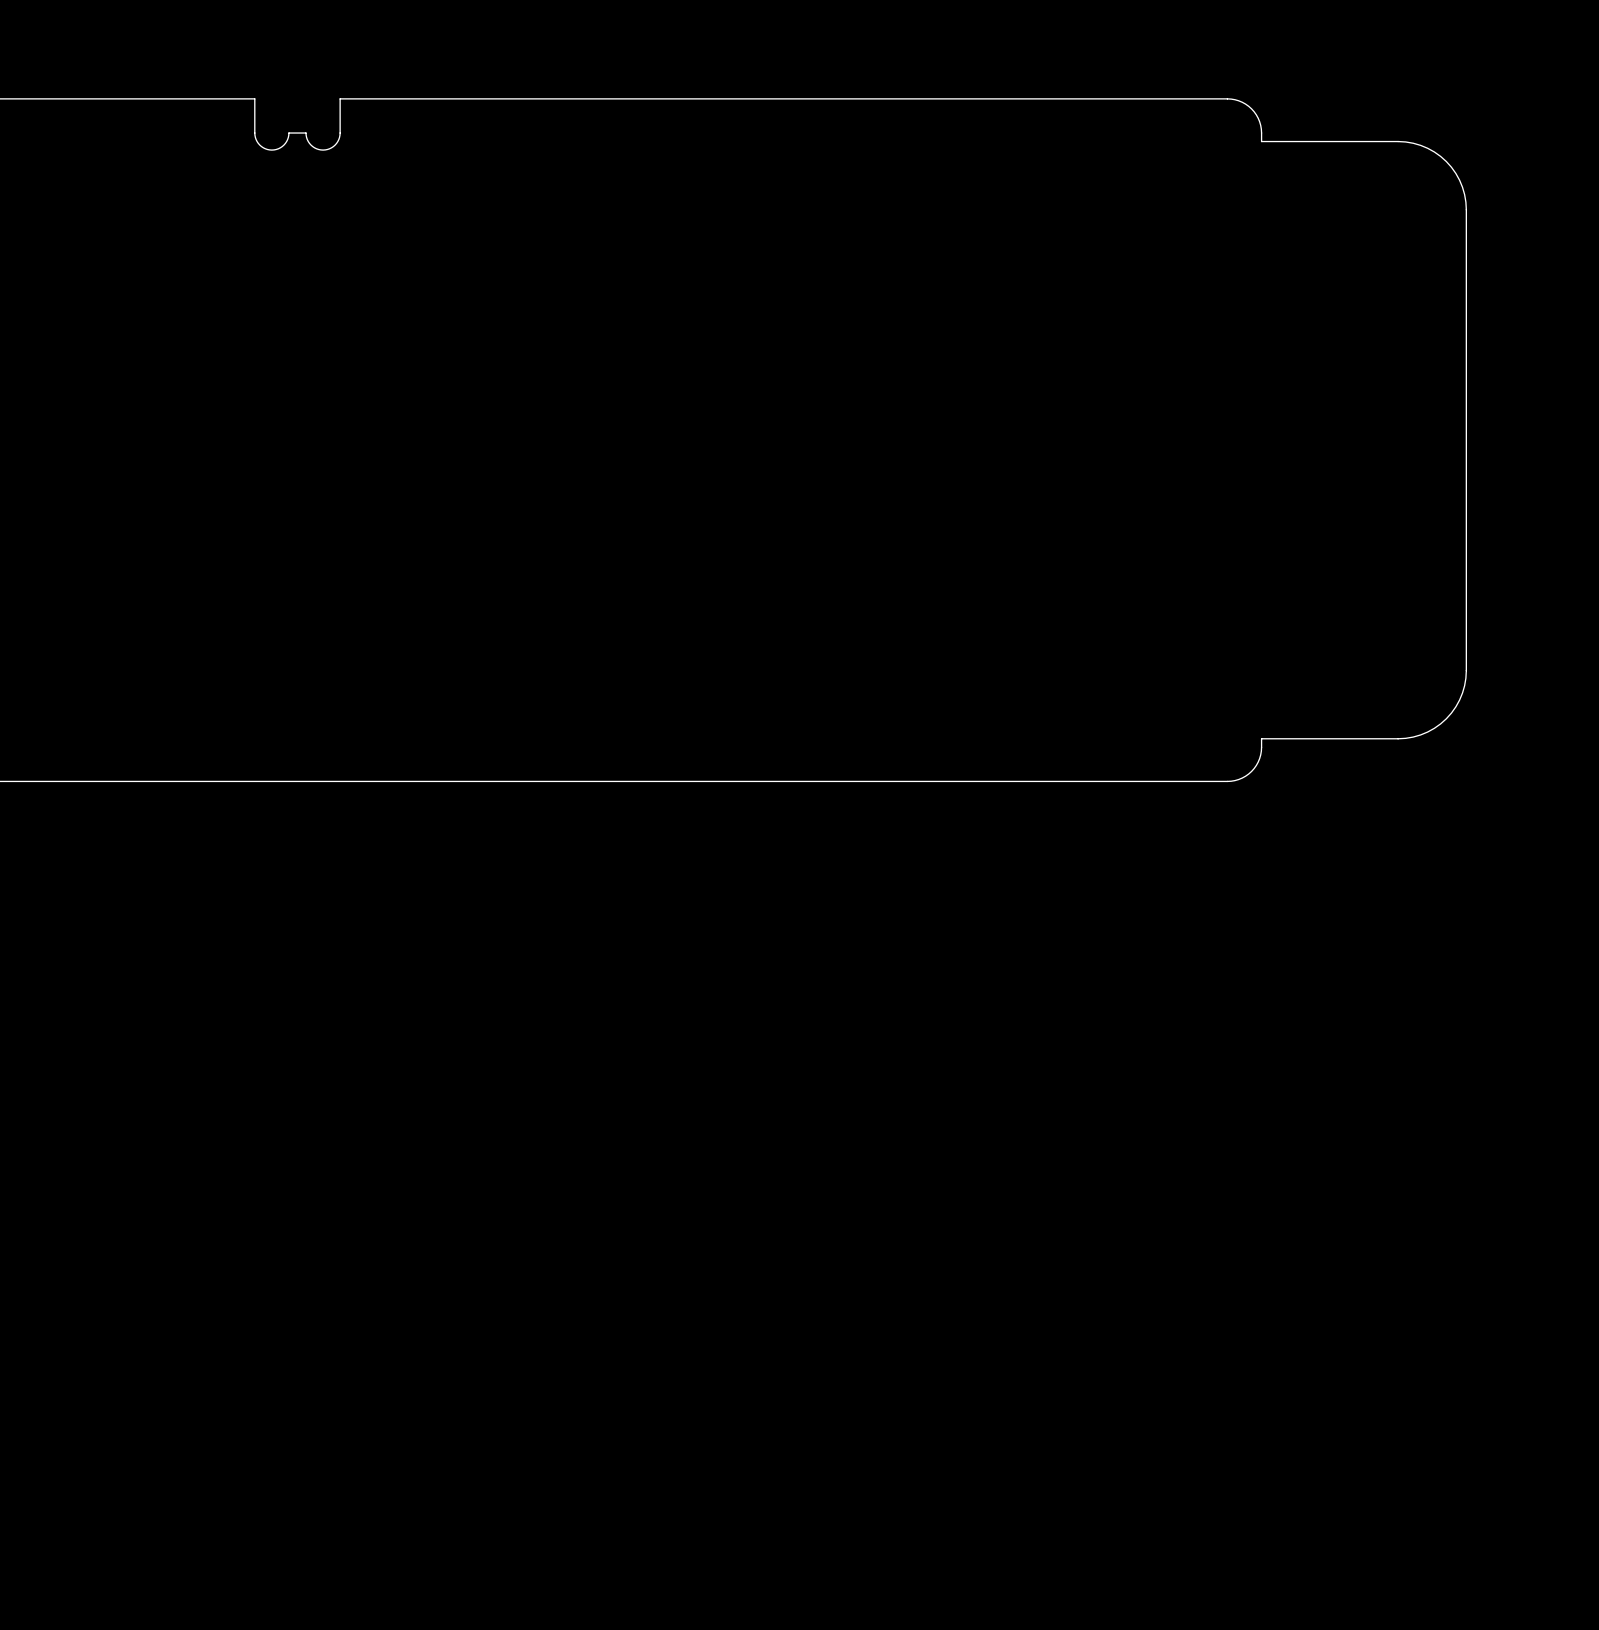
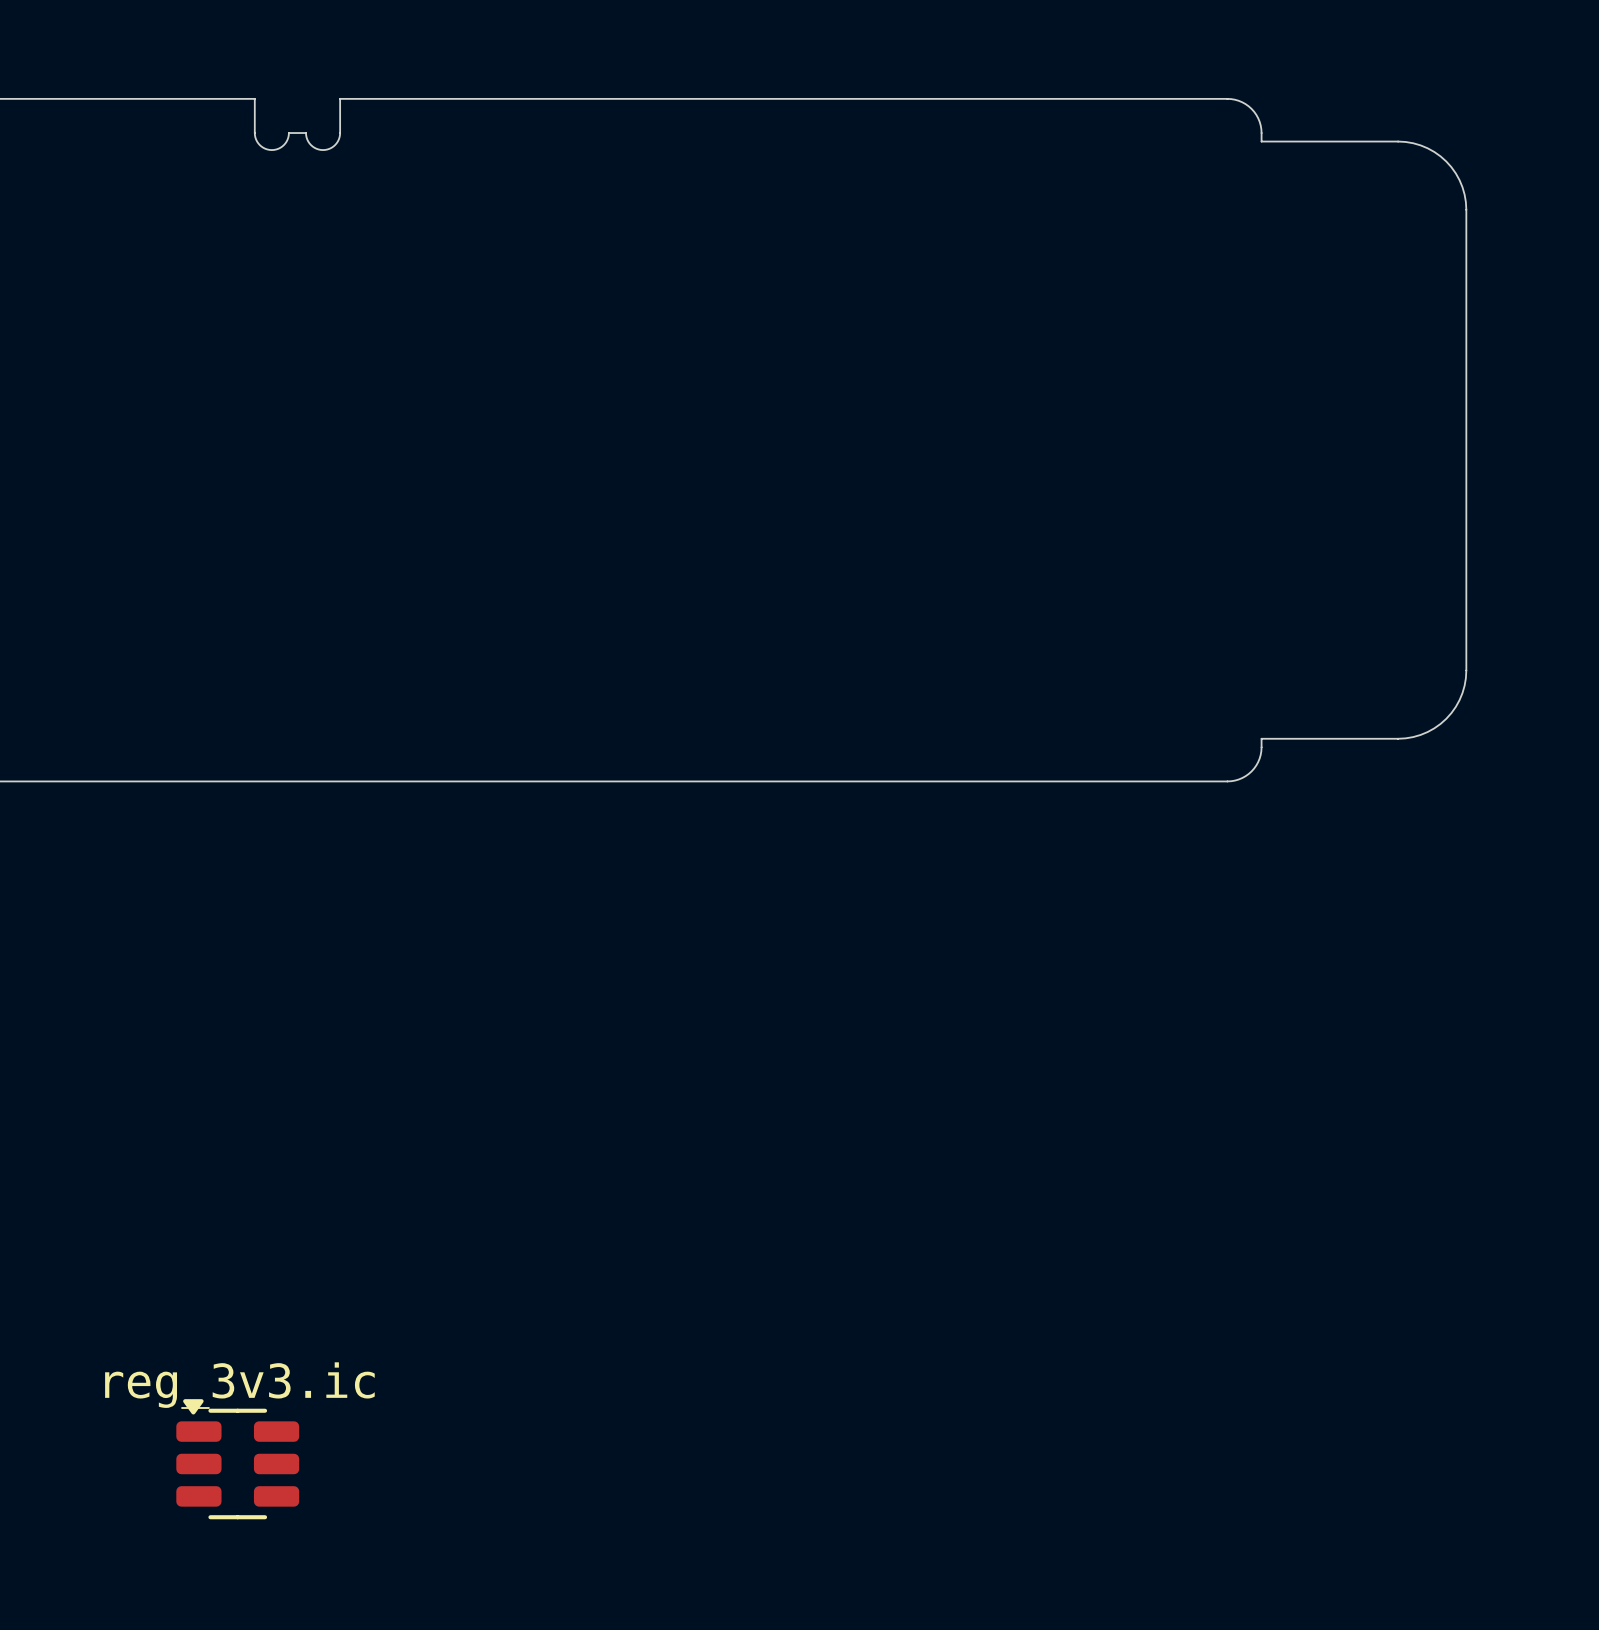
reg_3v3.ic: none -> (237, 1459)

